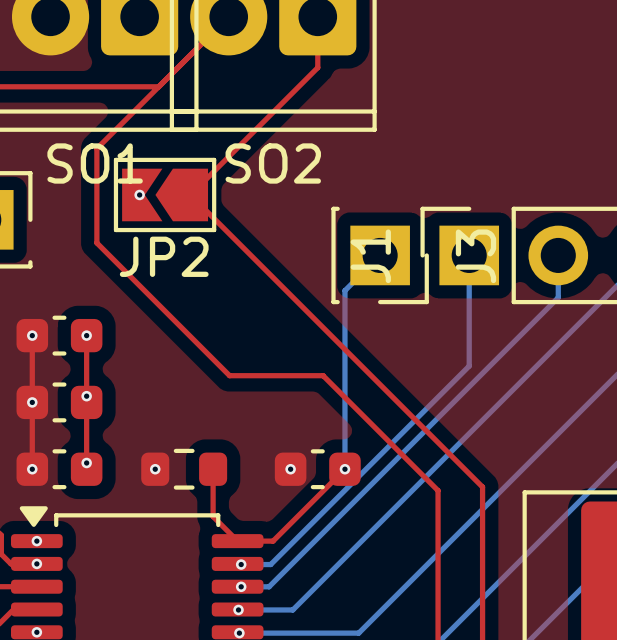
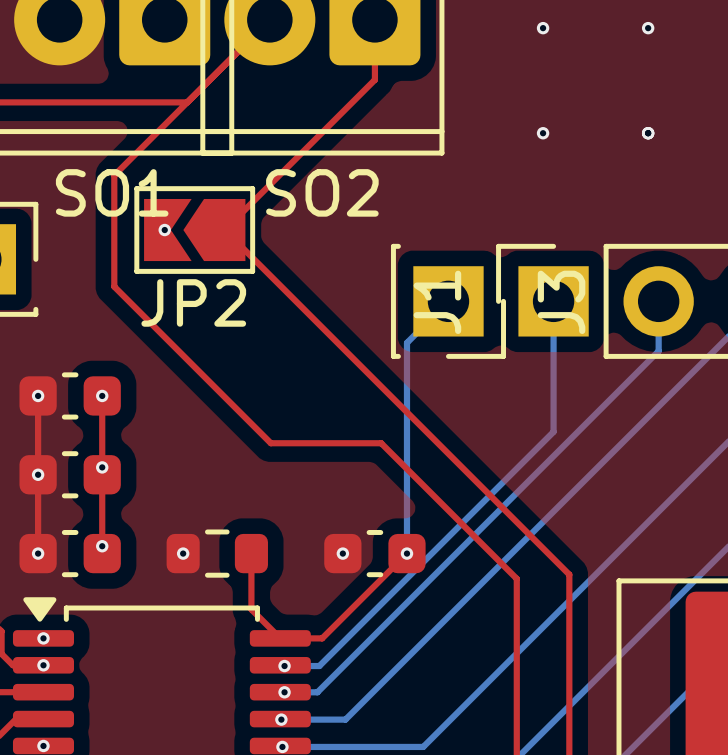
via: none -> (543, 28)
via: none -> (648, 28)
via: none -> (543, 133)
via: none -> (648, 133)

